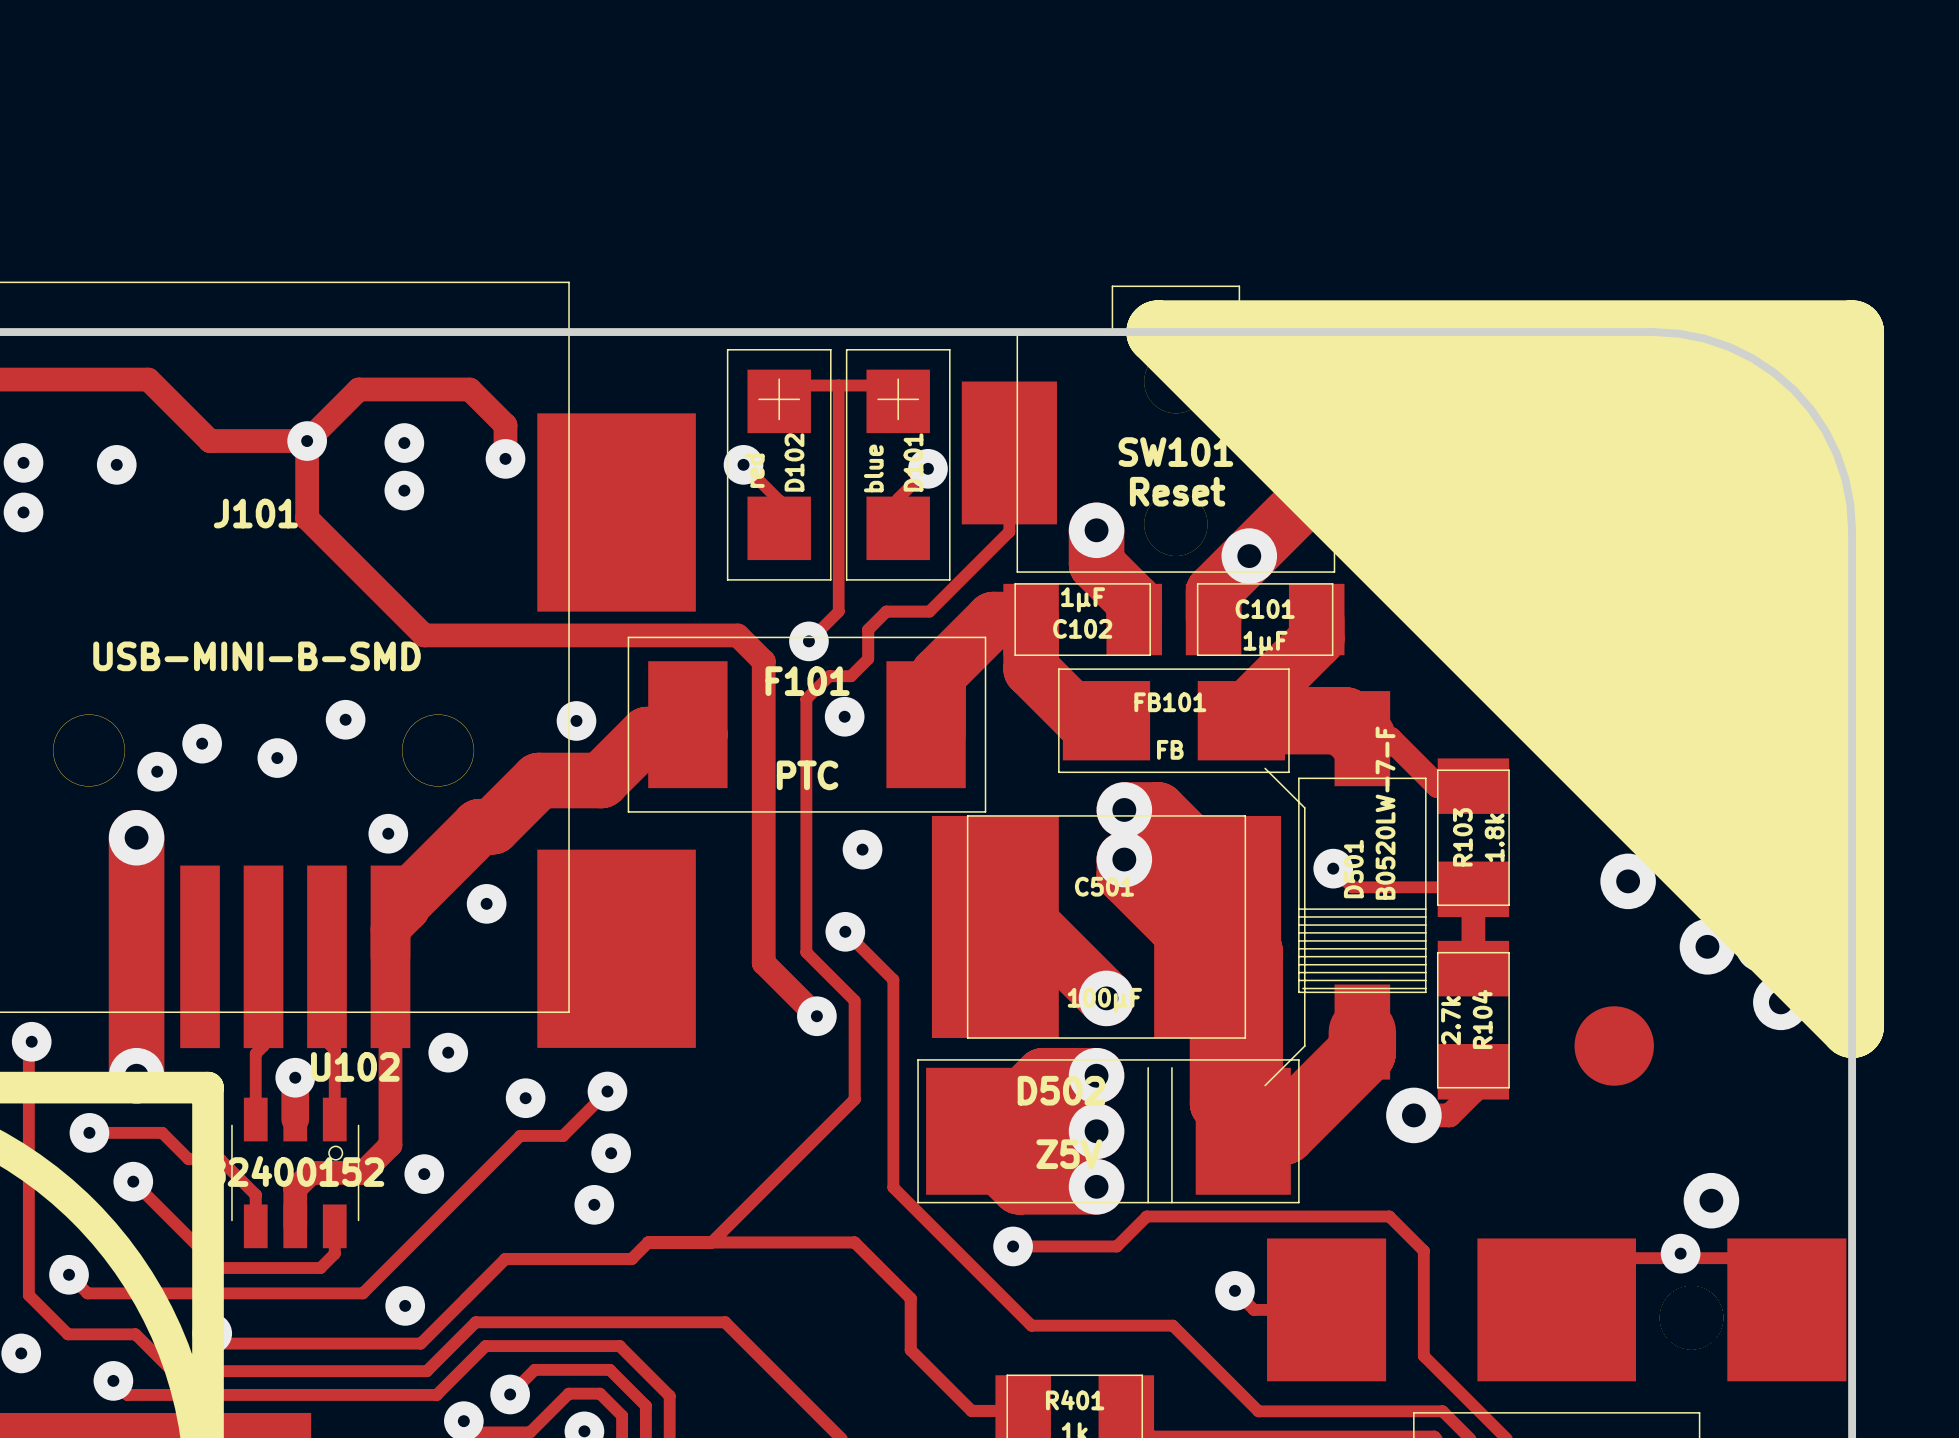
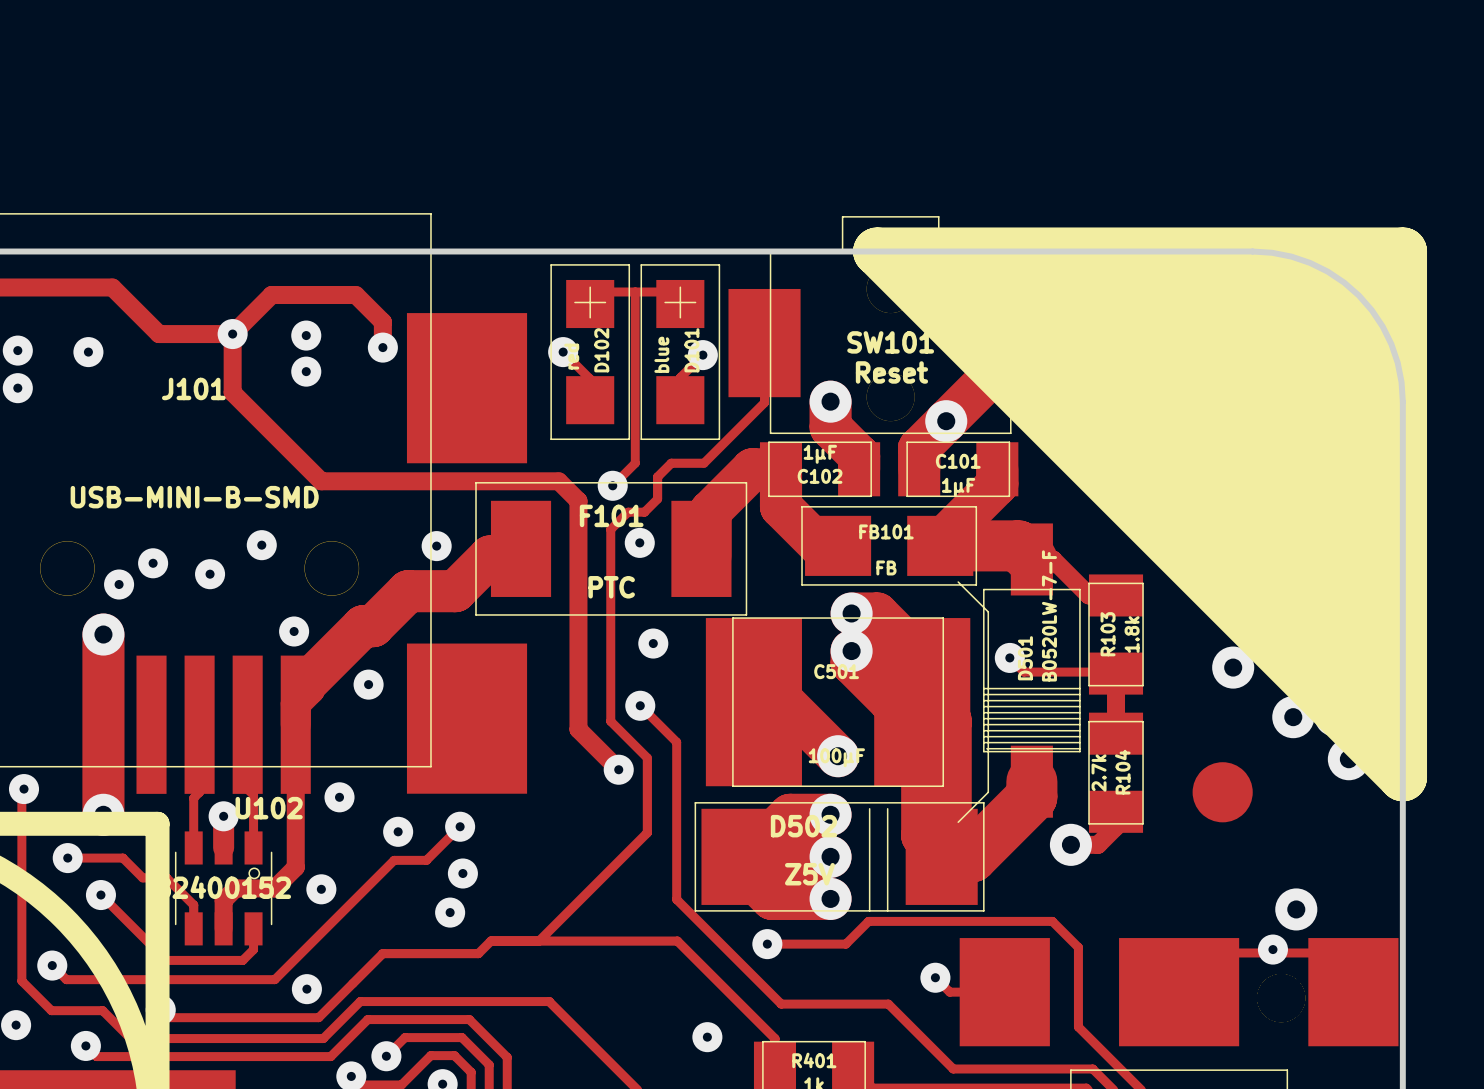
track: (854, 1242) (910, 1298) (910, 1350) (971, 1410) (1023, 1410) -> (647, 941) (677, 941) (774, 1038) (774, 1068)
via: none -> (707, 1037)

